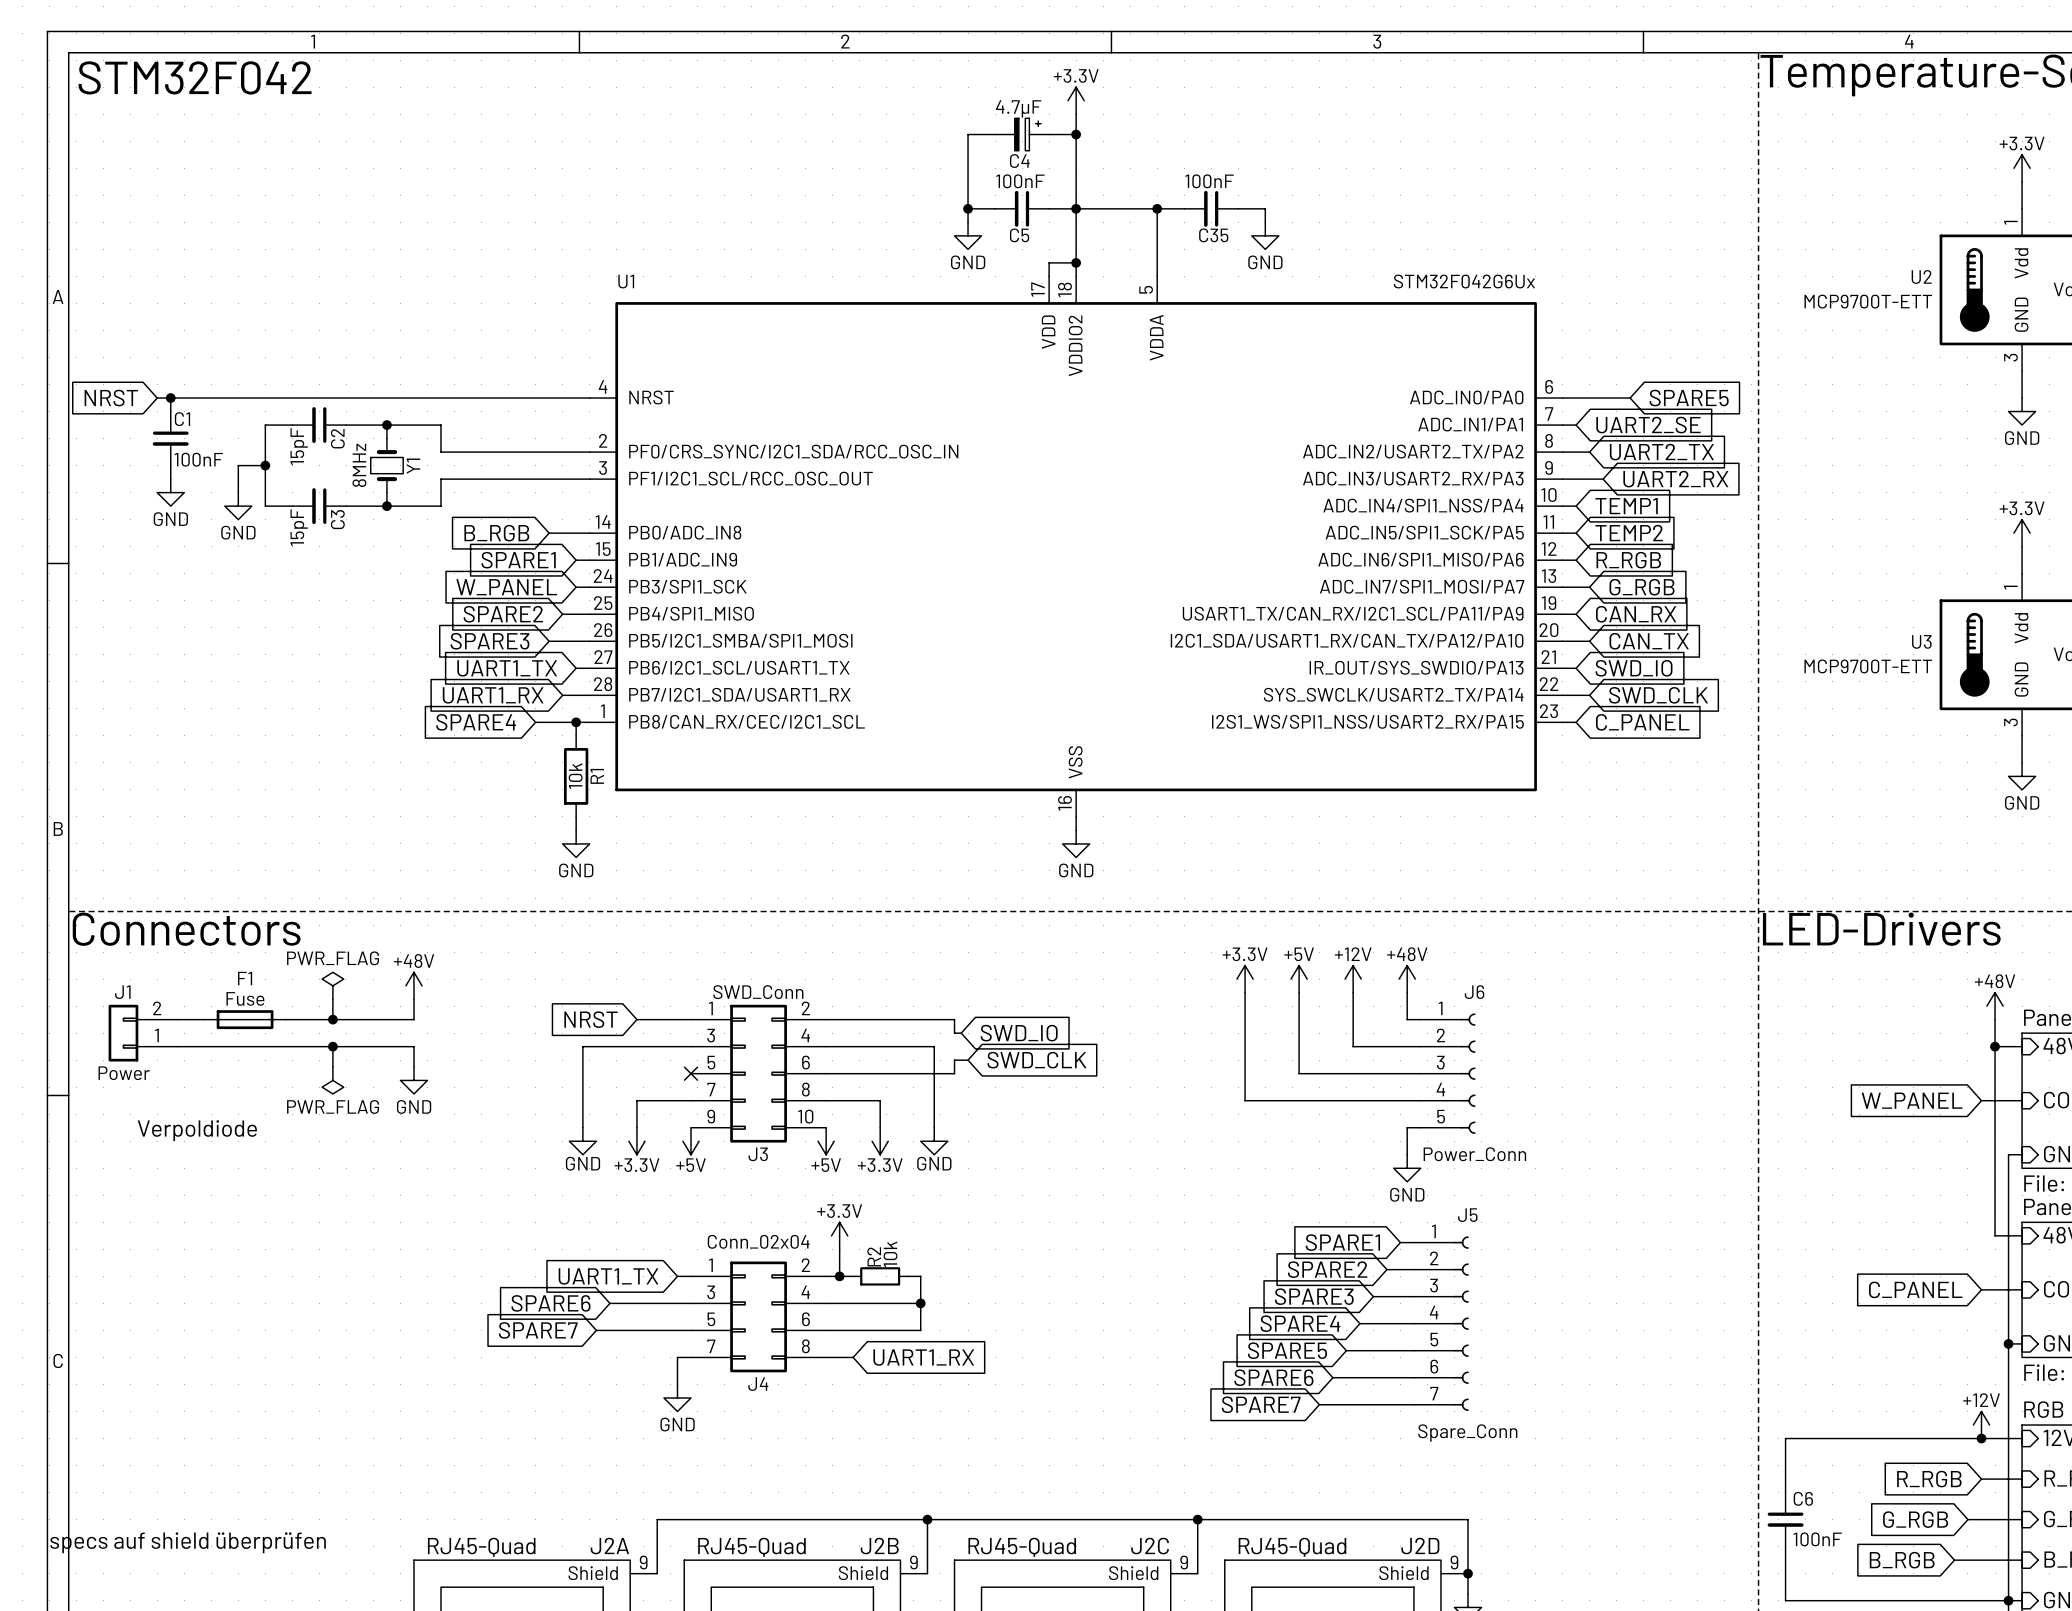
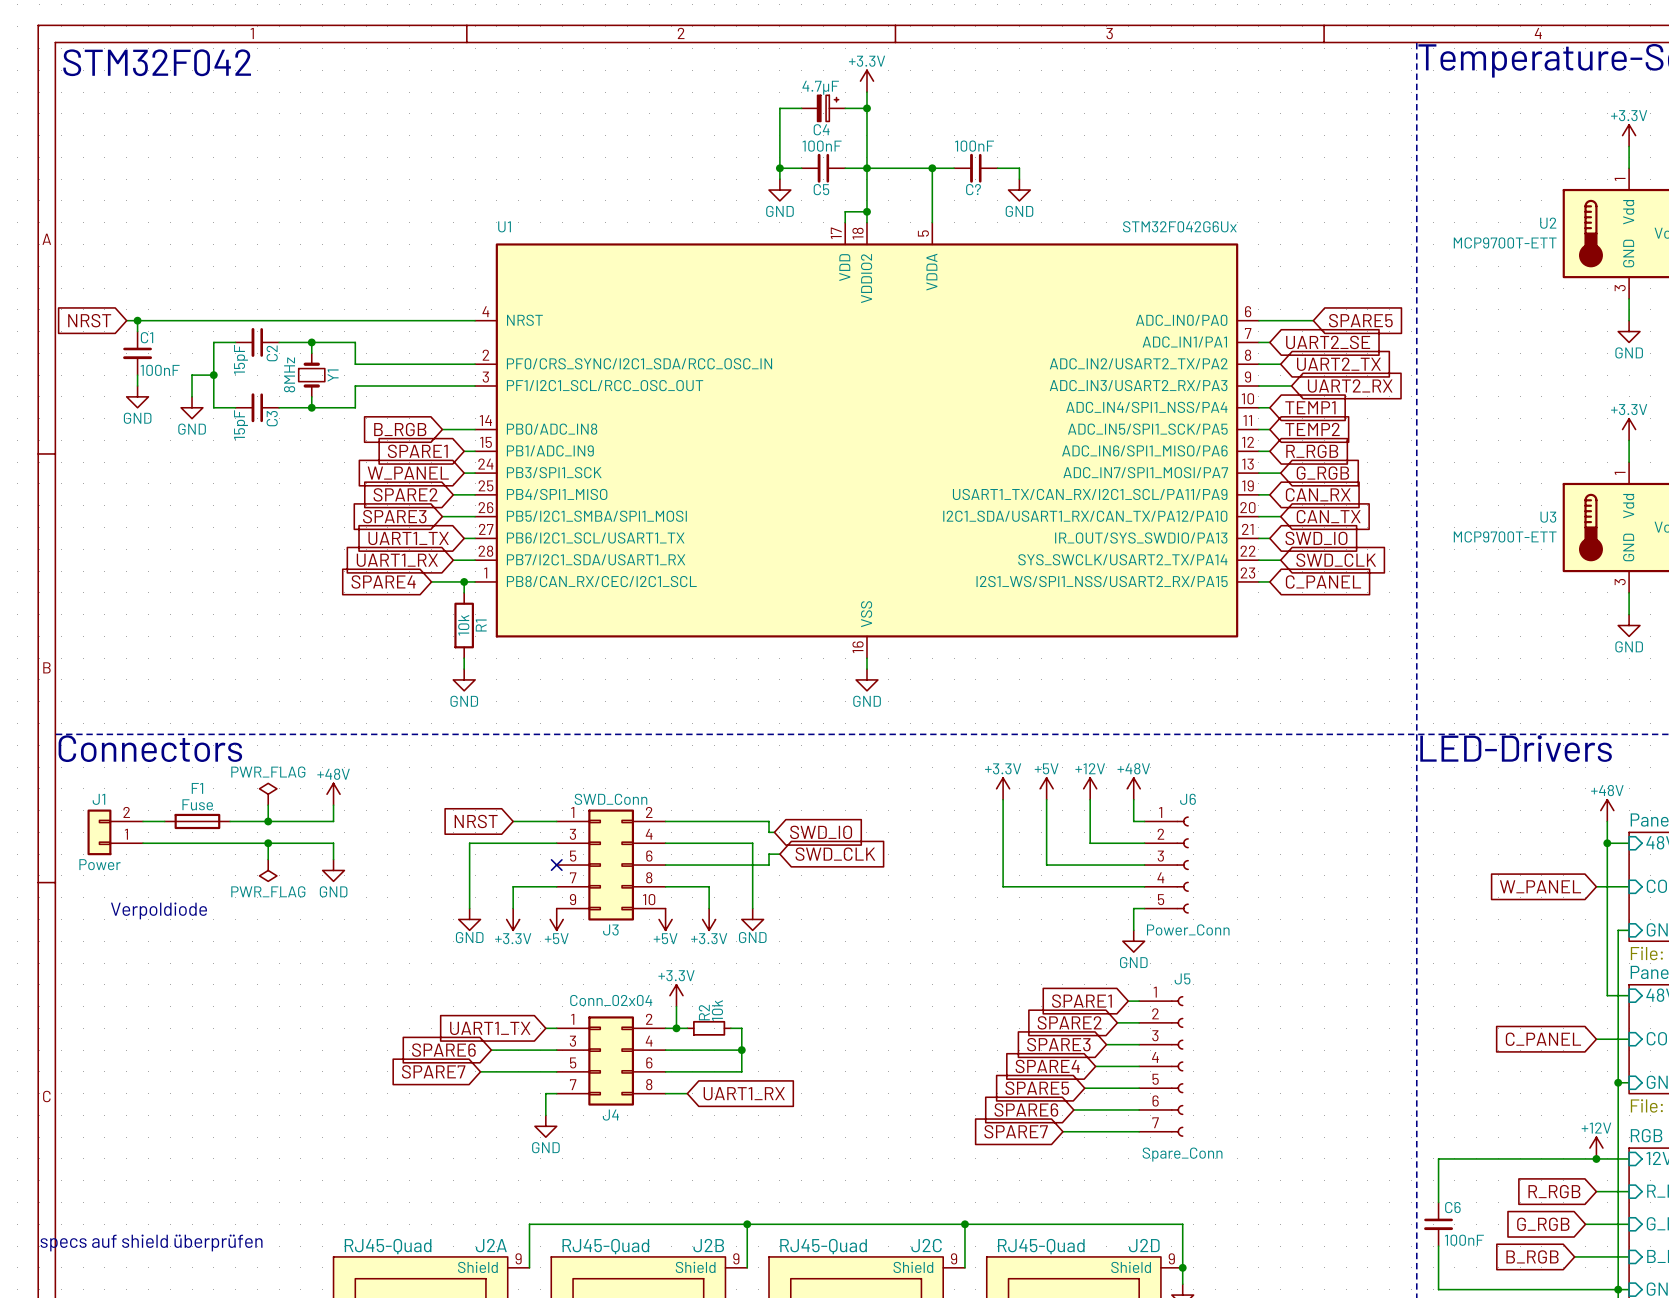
C35 name: C35 (1213, 235) -> C? (973, 189)

